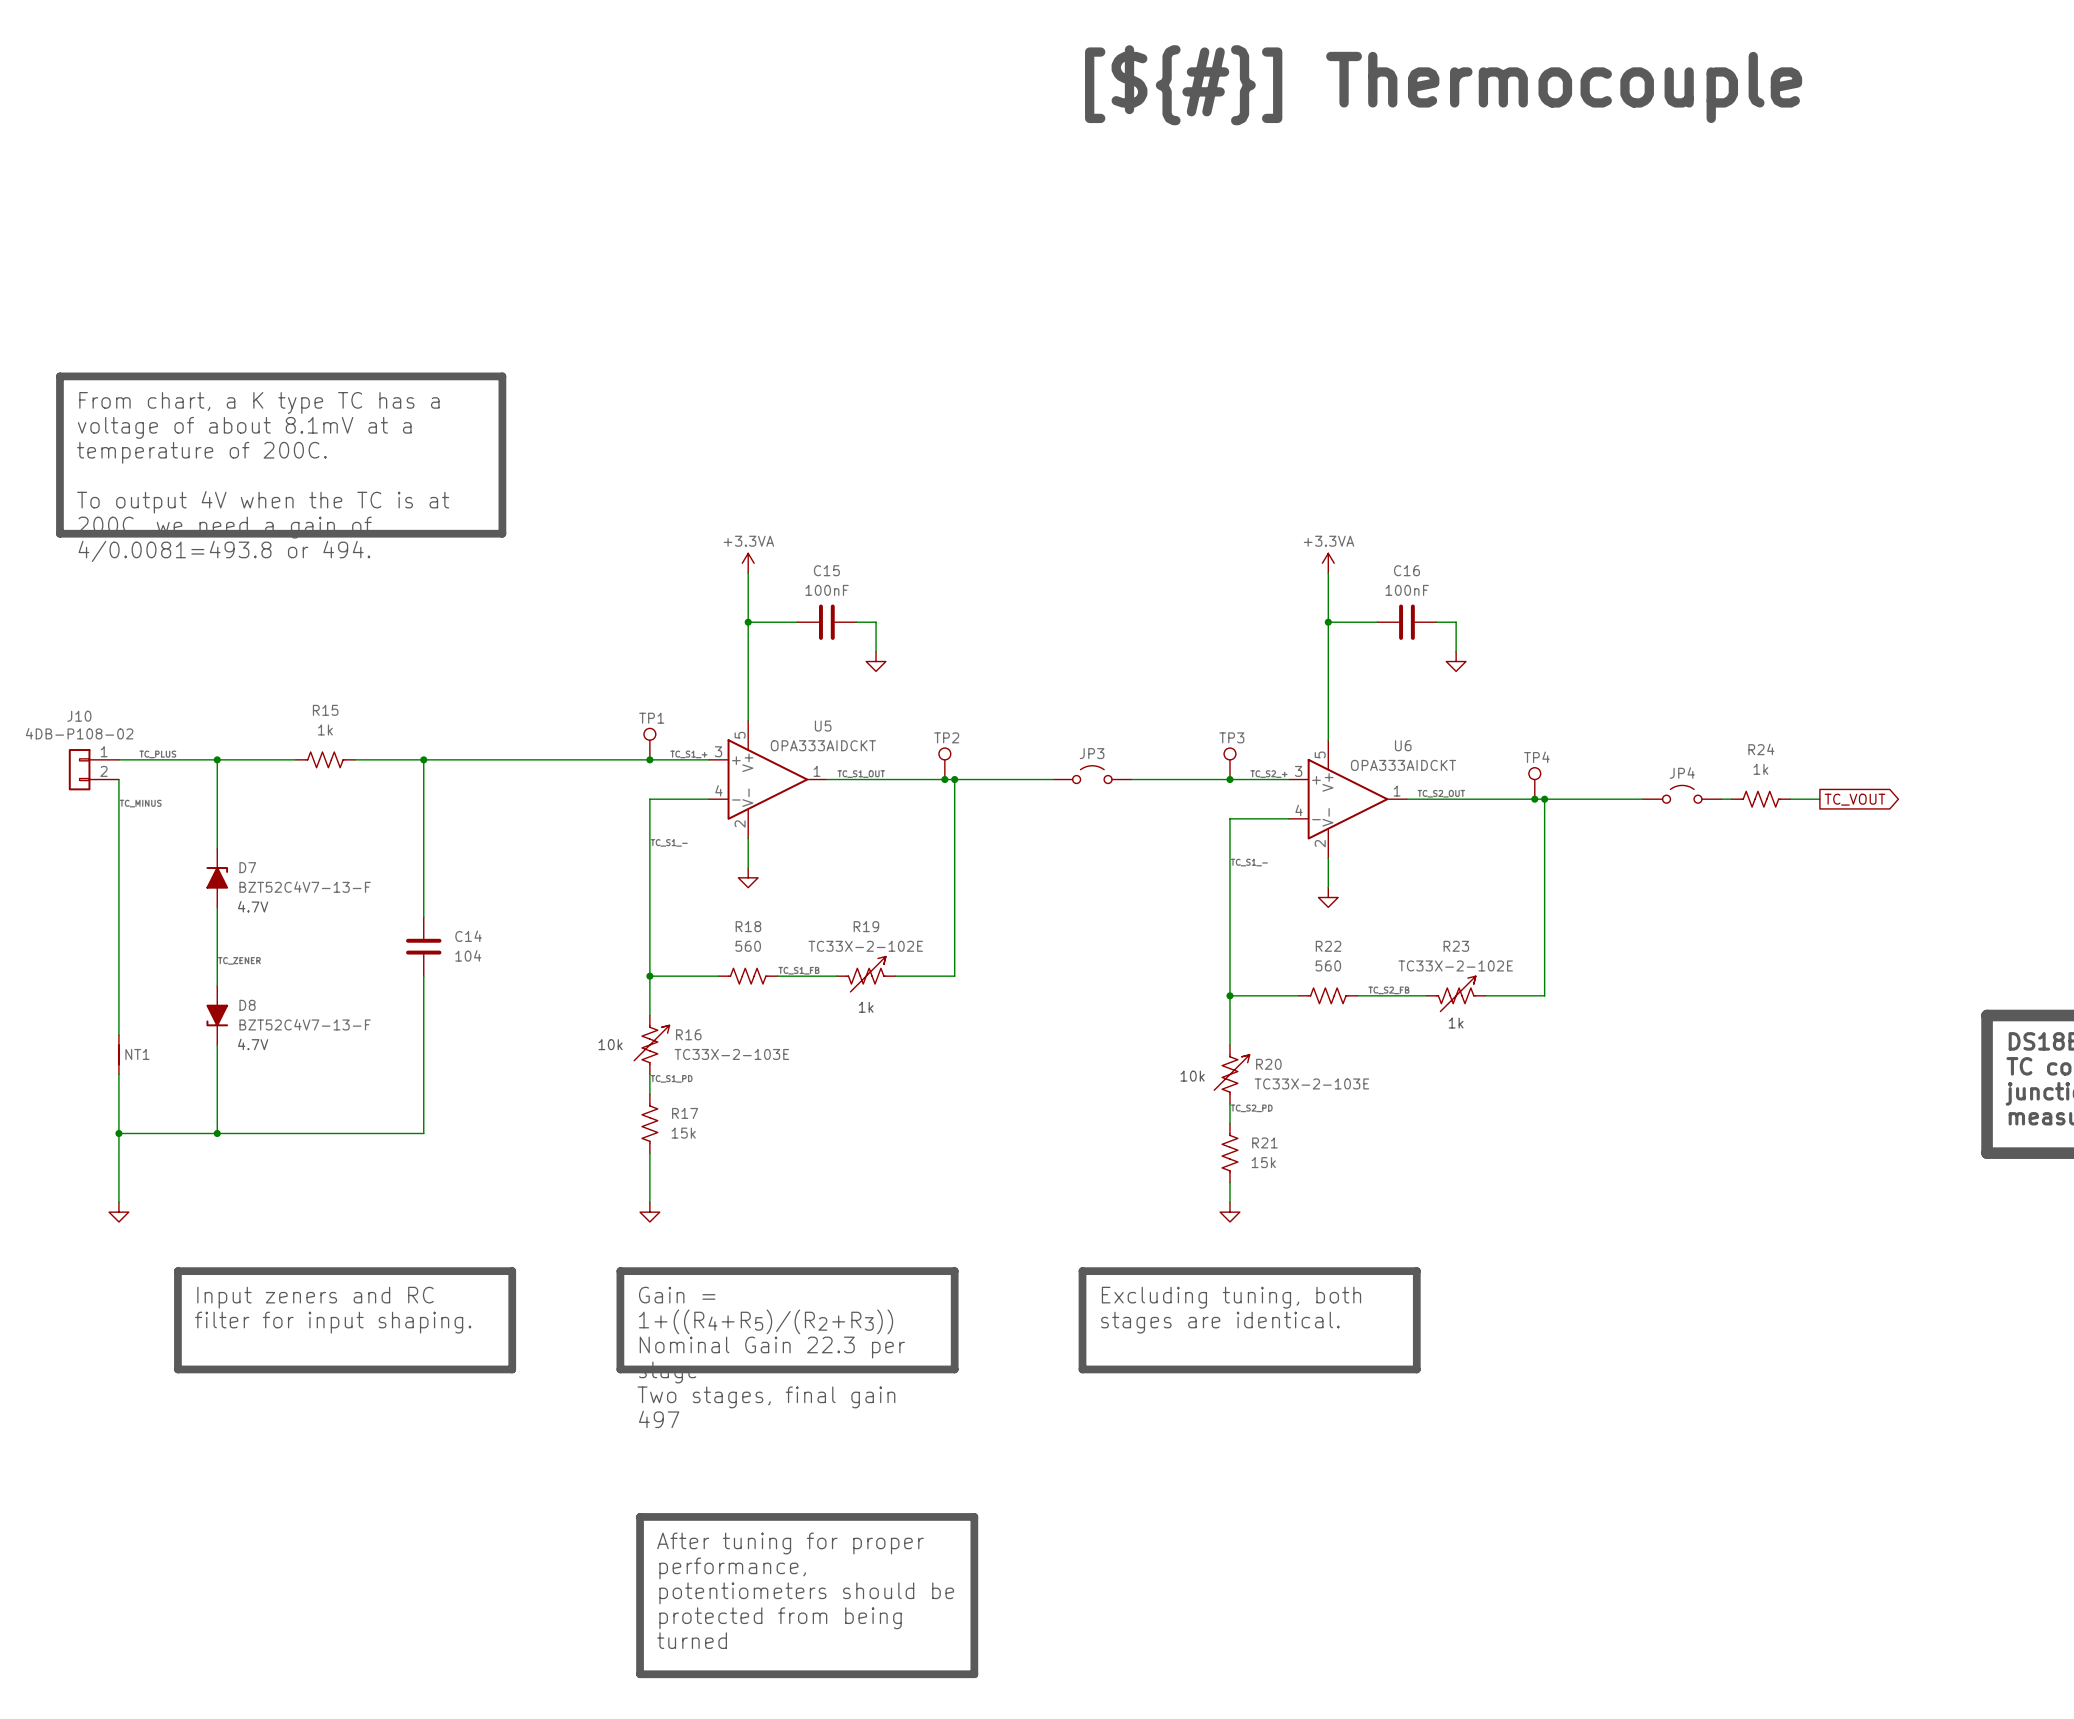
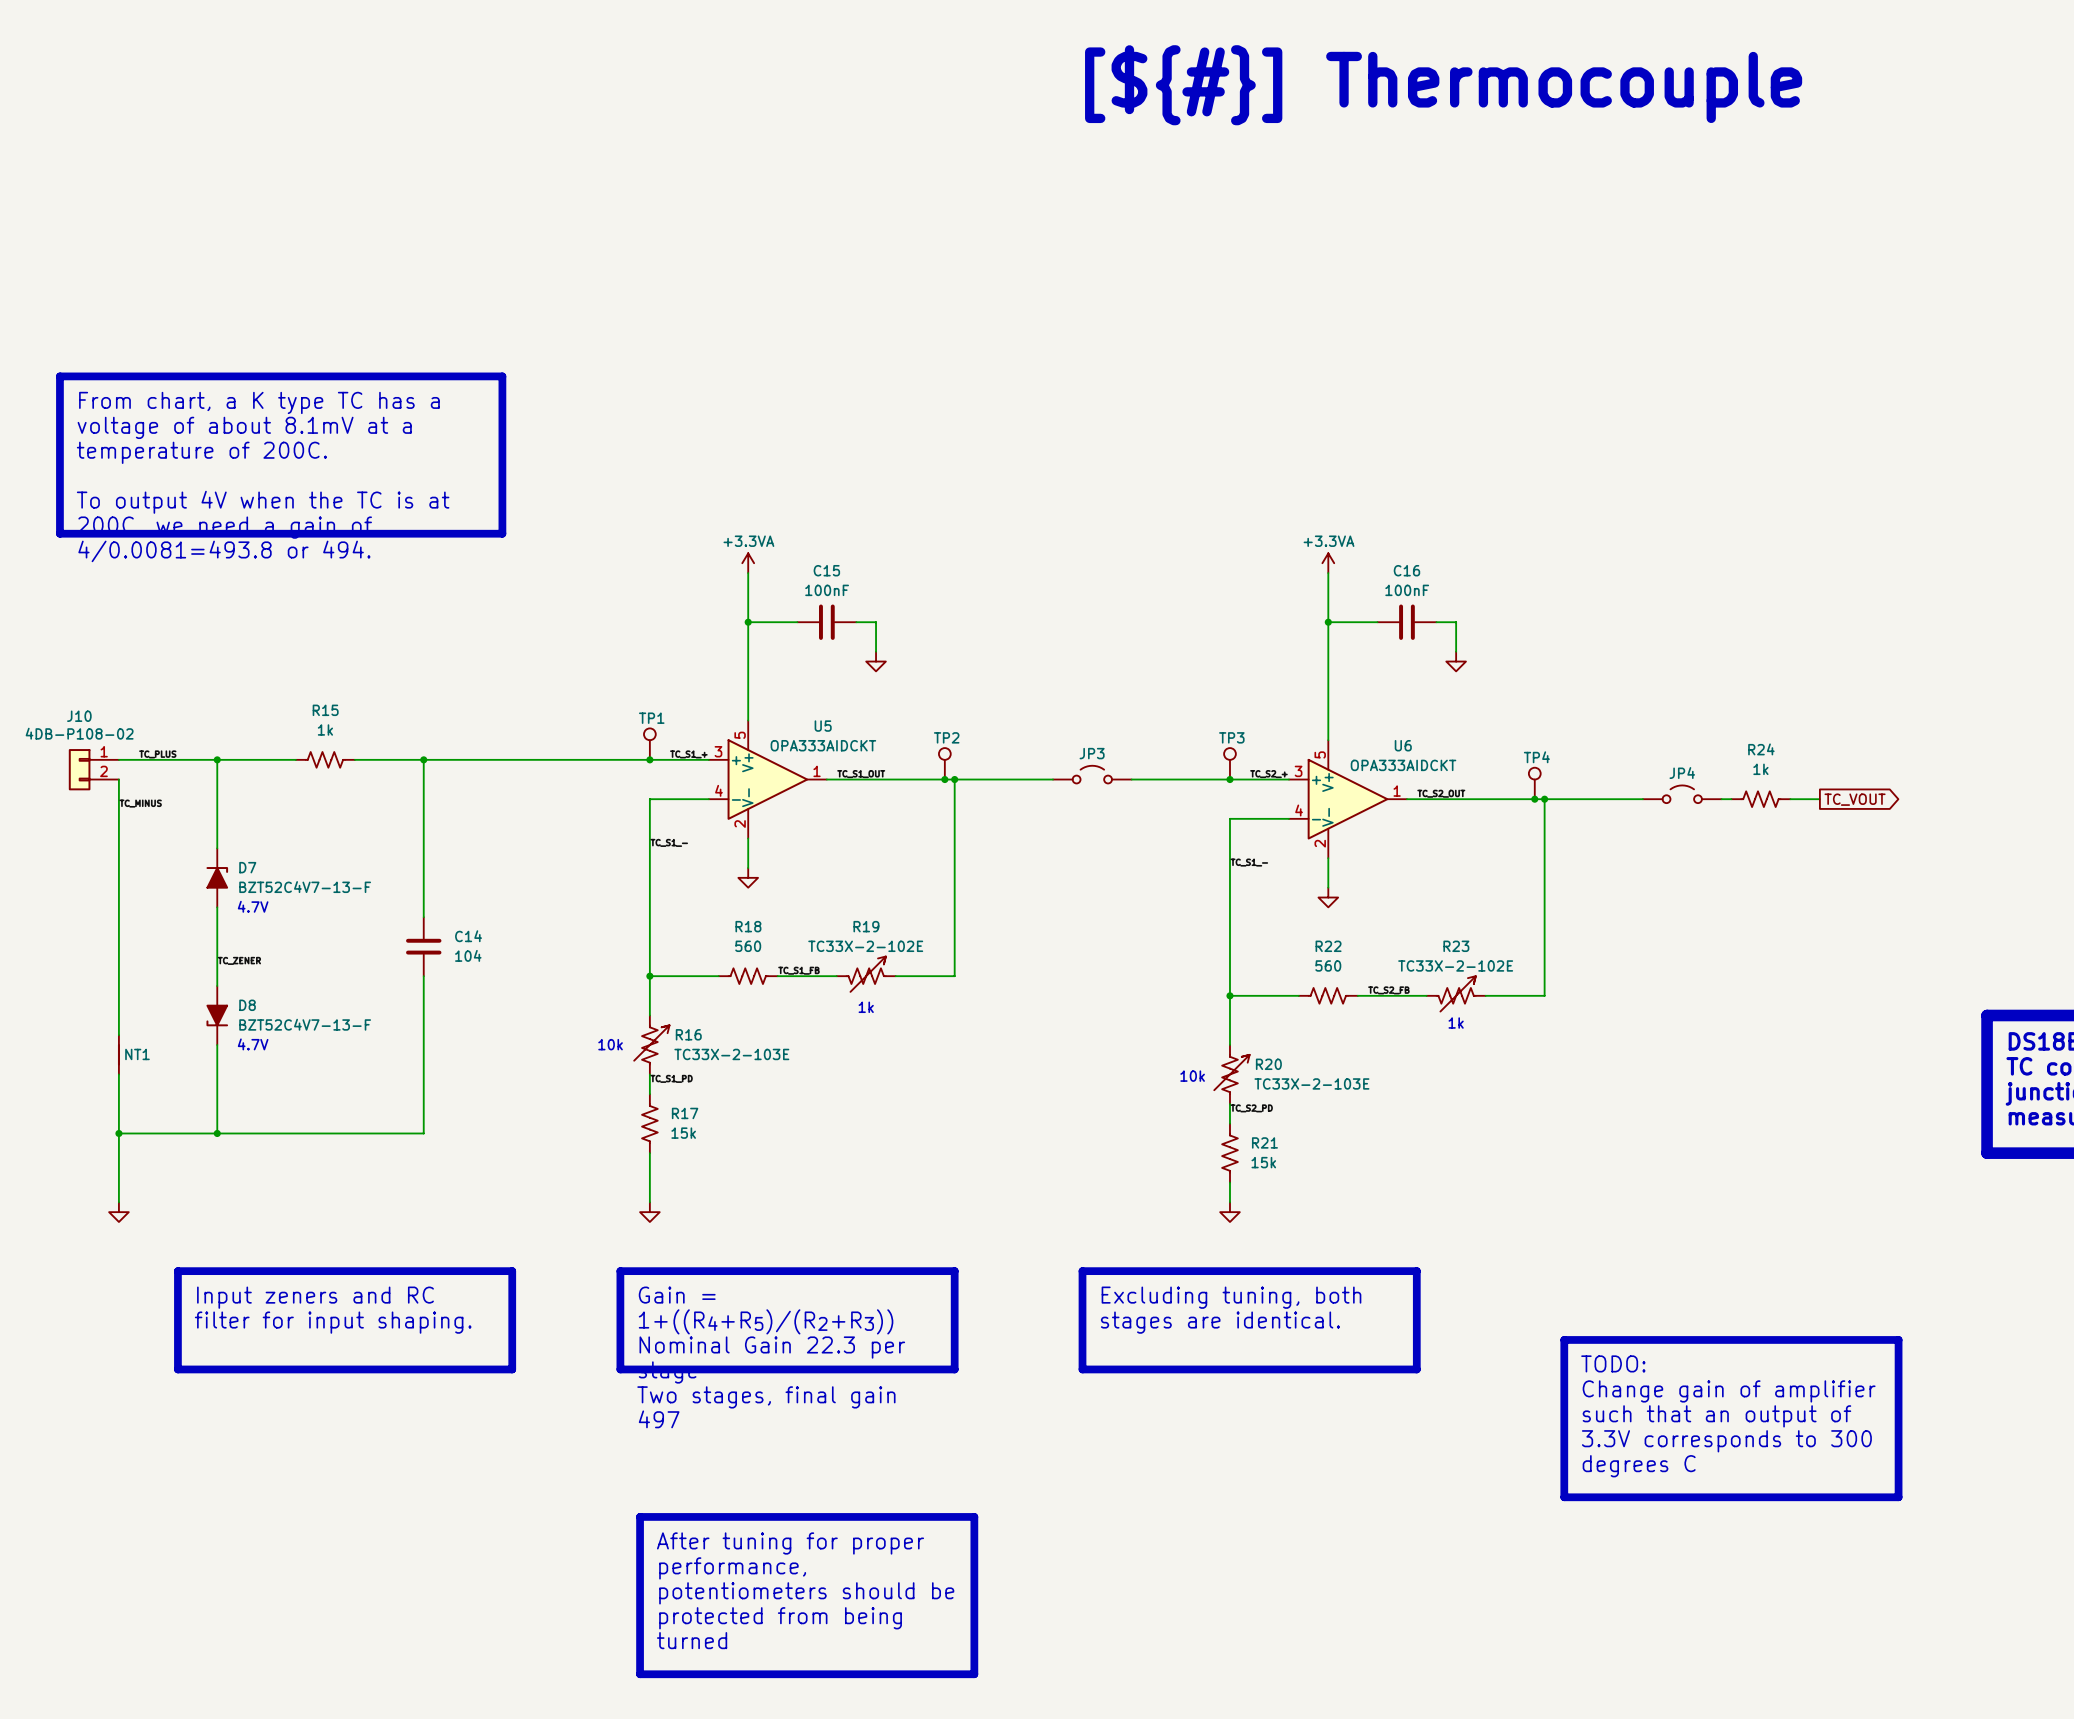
line: none -> (1564, 1339) (1898, 1339) (1898, 1497) (1564, 1497) (1564, 1339)
text: none -> TODO: (1613, 1363)
text: none -> Change gain of amplifier (1729, 1391)
text: none -> such that an output of (1716, 1416)
text: none -> 3.3V corresponds to 300 (1726, 1441)
text: none -> degrees C (1639, 1466)

